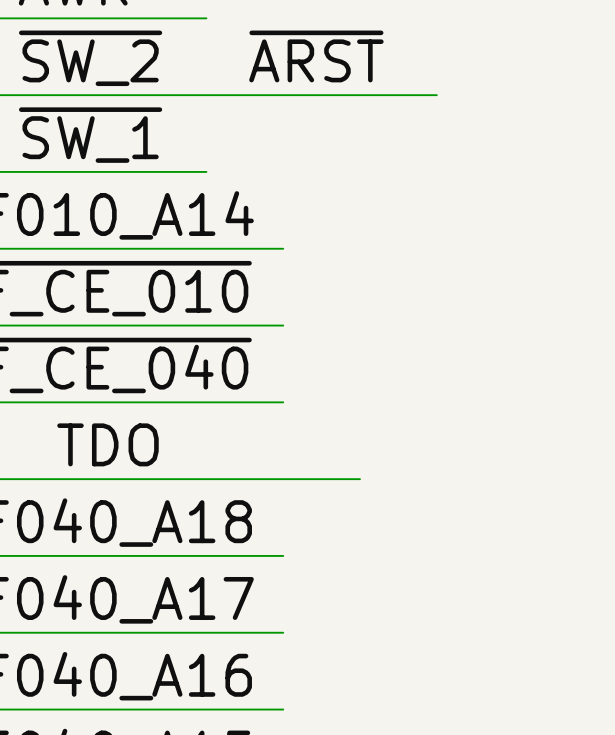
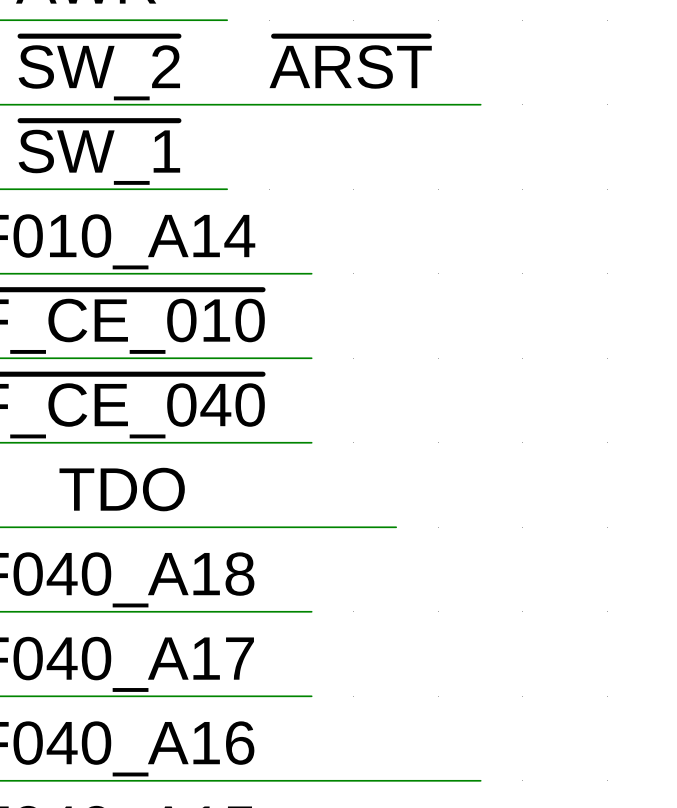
wire: none -> (311, 780) (480, 780)

